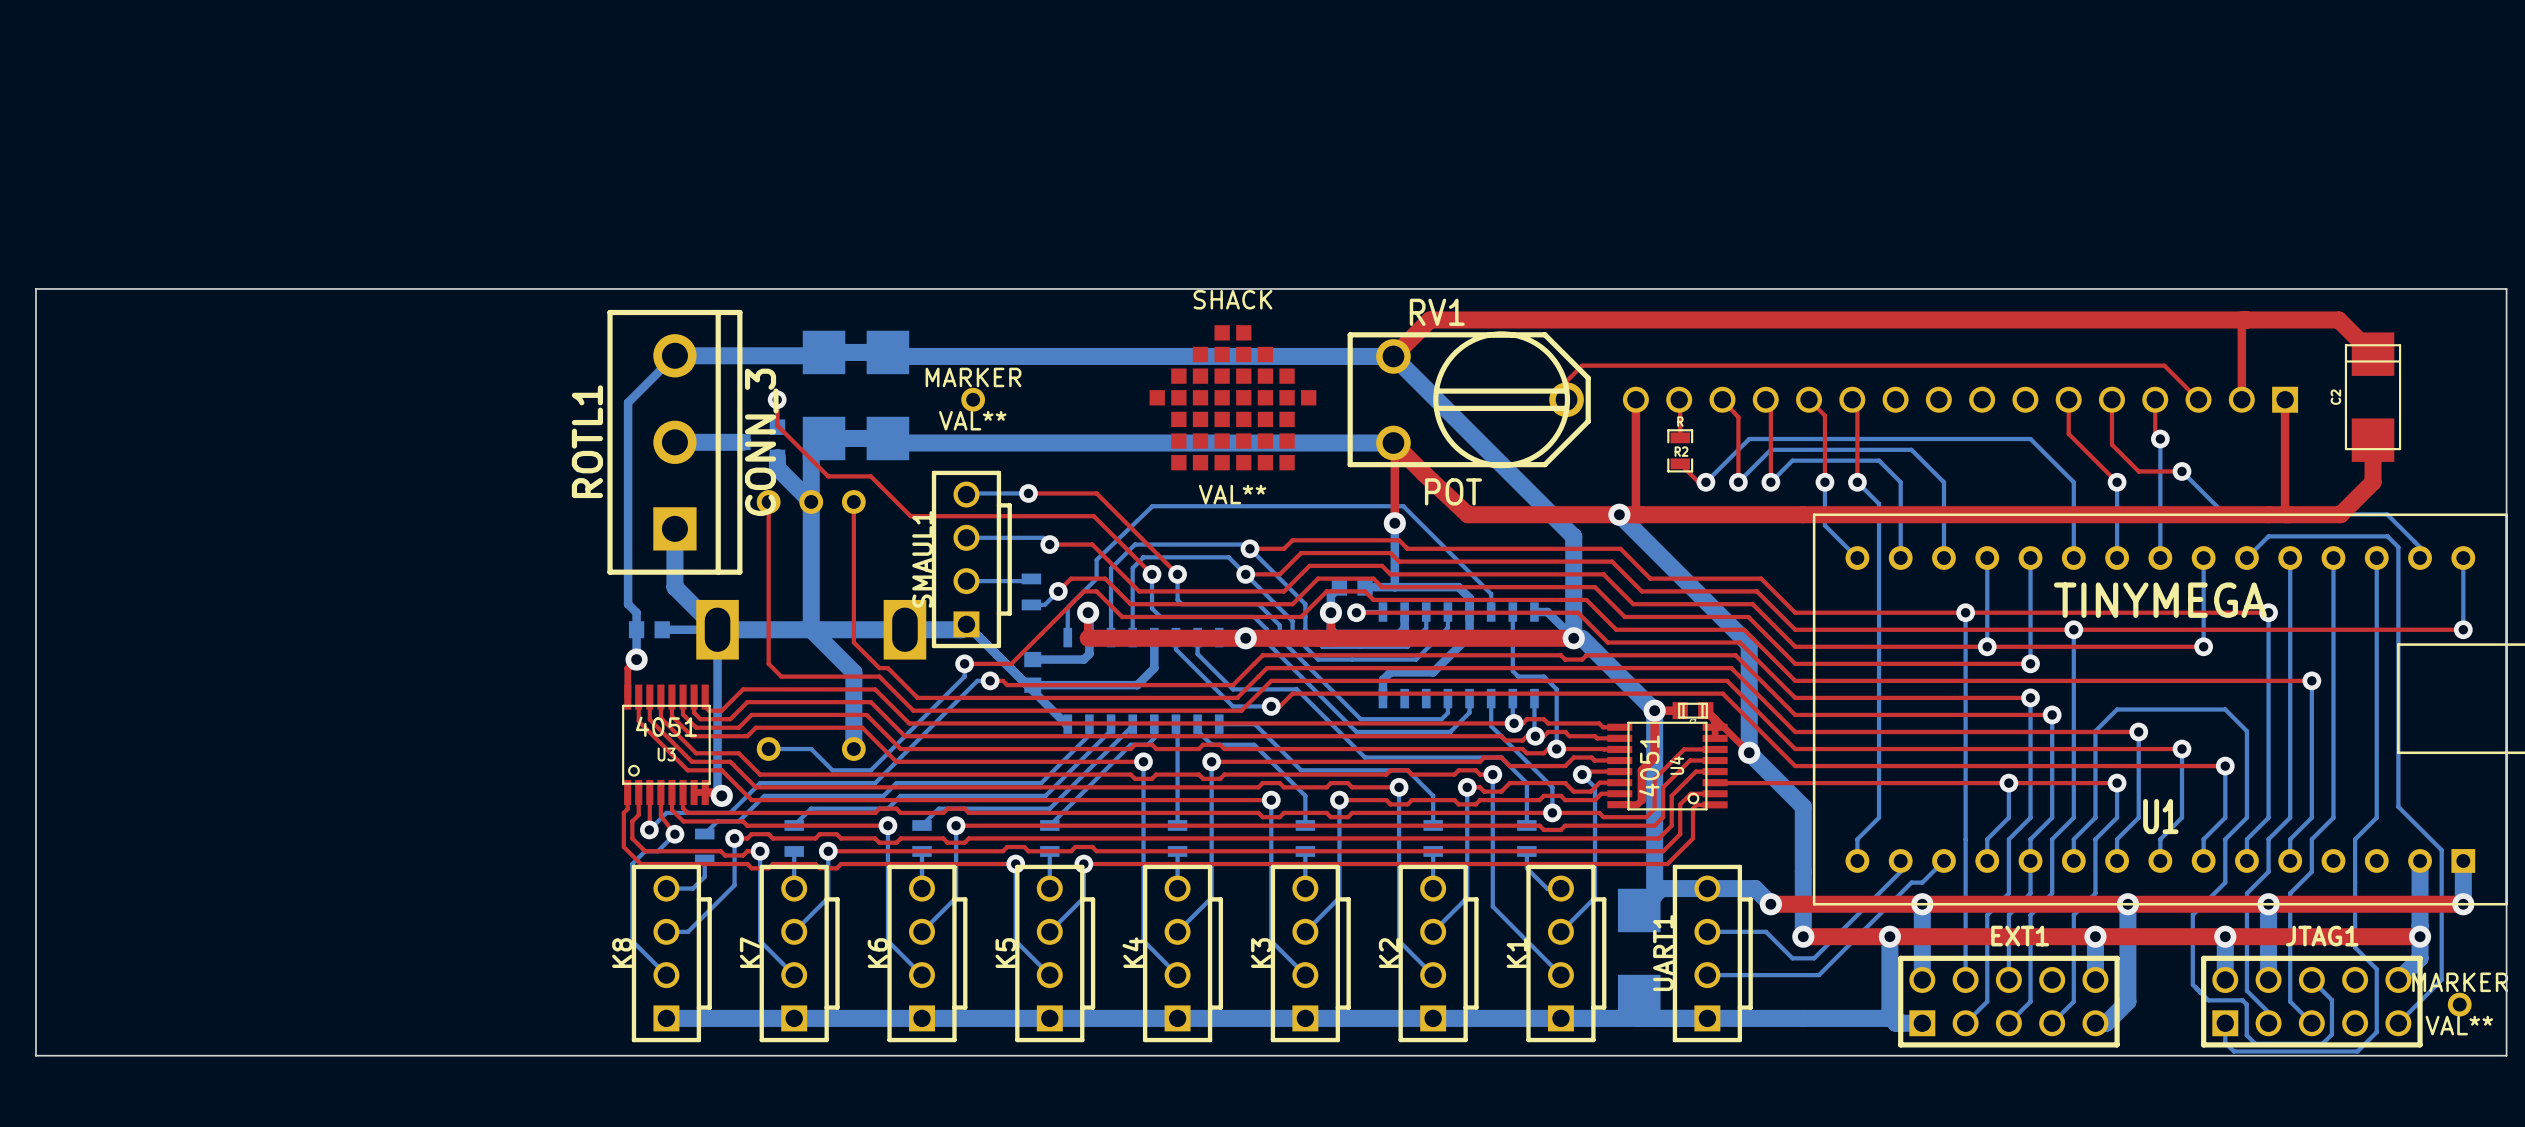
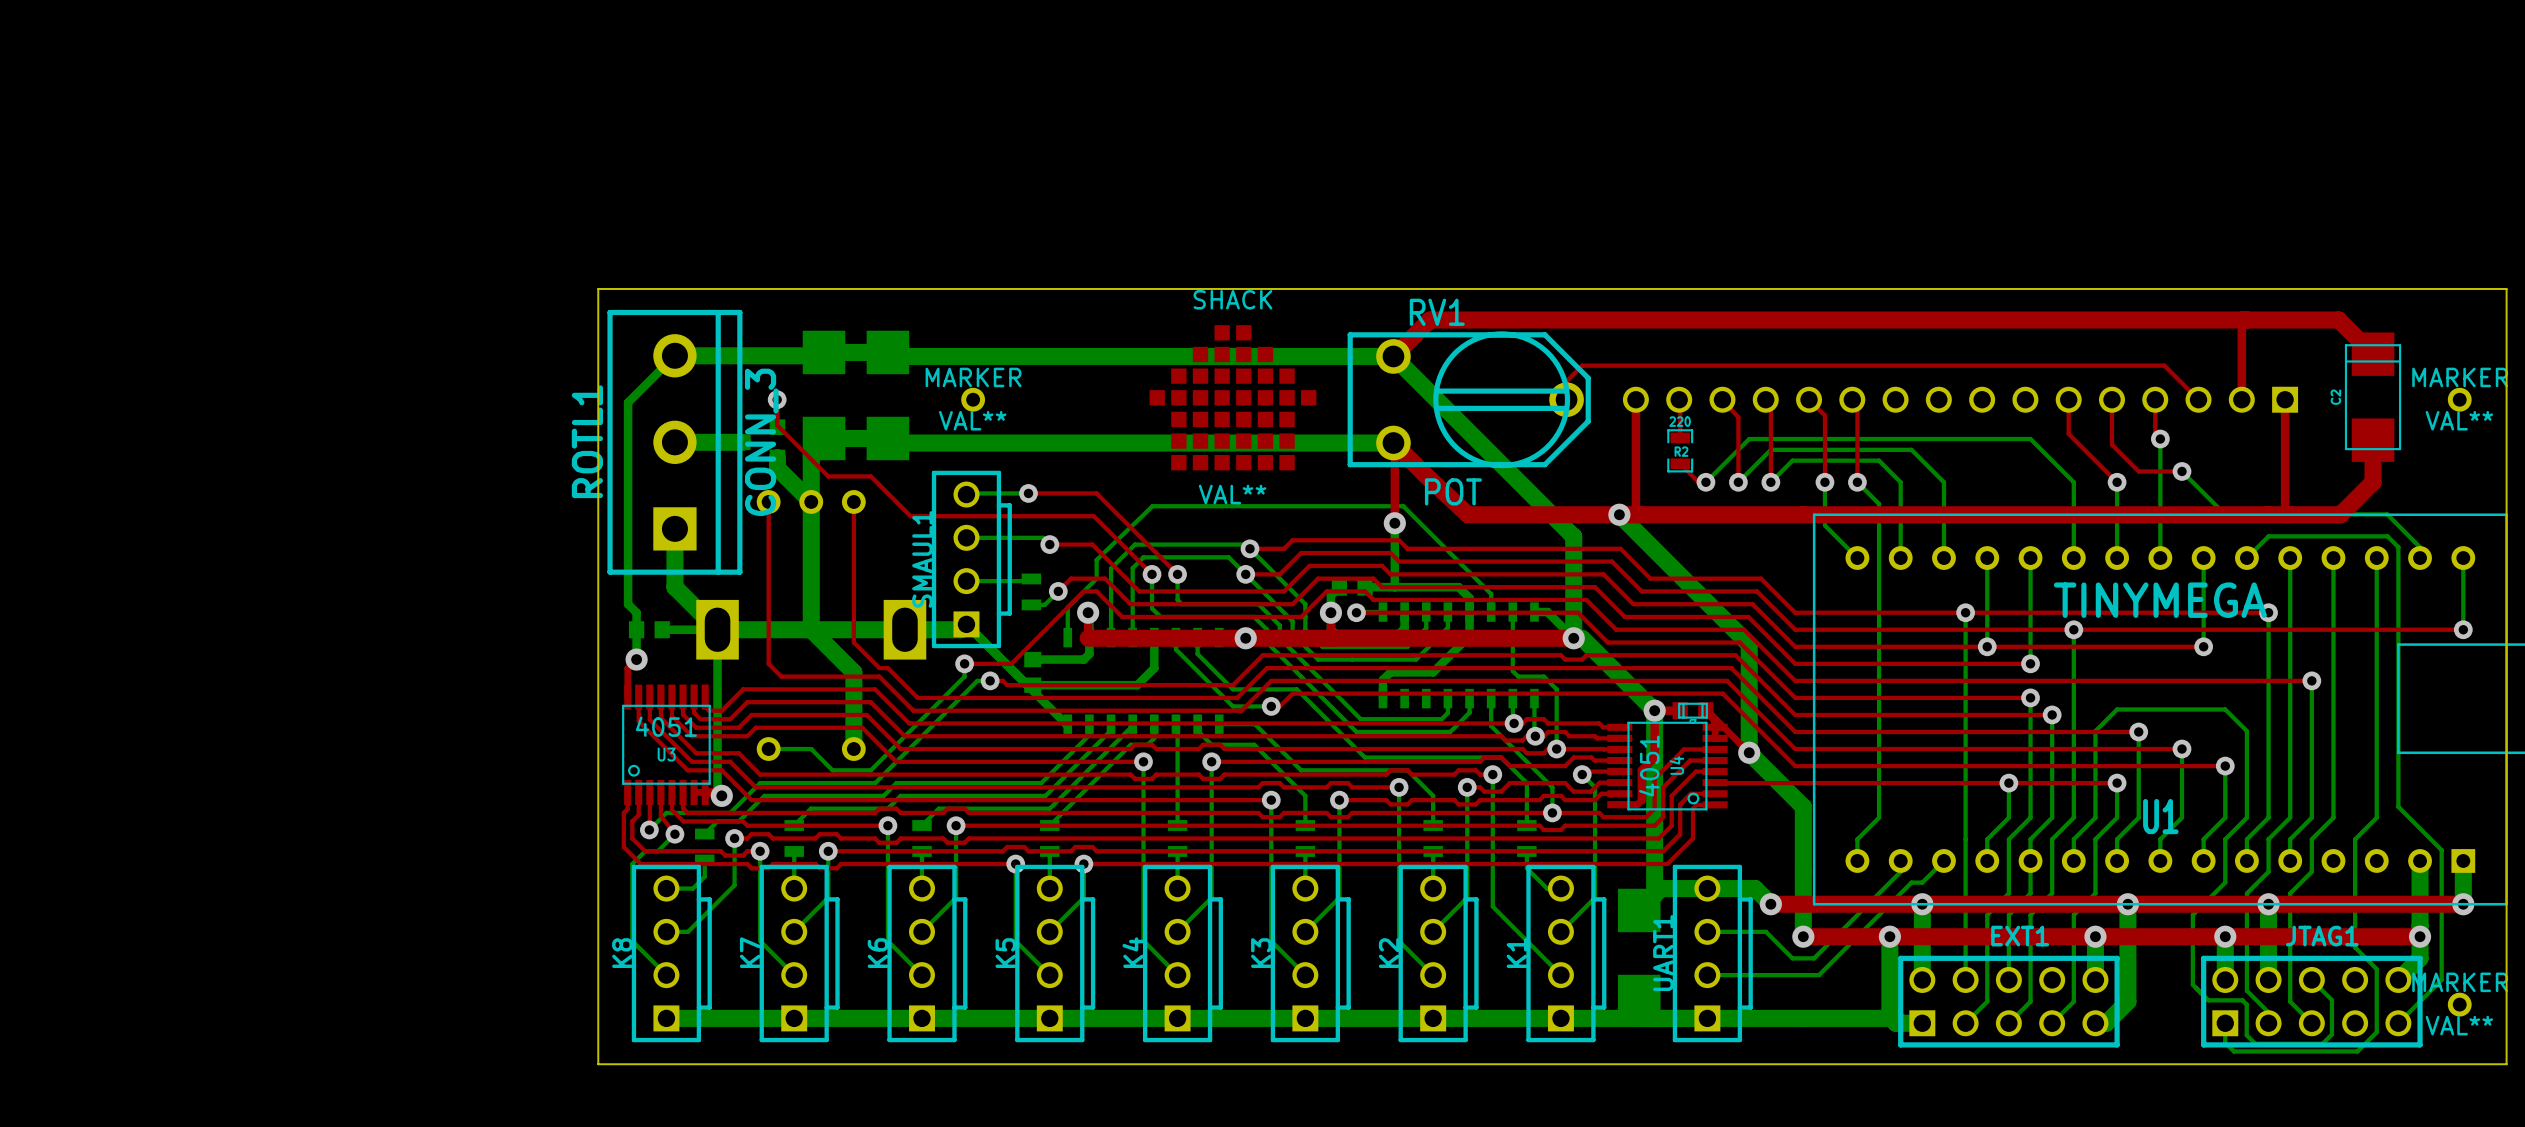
board edge: (598, 288) (36, 288) (36, 1055) (2506, 1055) -> (598, 288) (598, 1064) (2506, 1064) (2506, 1055)
MARKER: none -> VAL** (2459, 399)
R2 value: R (1680, 421) -> 220 (1680, 421)

